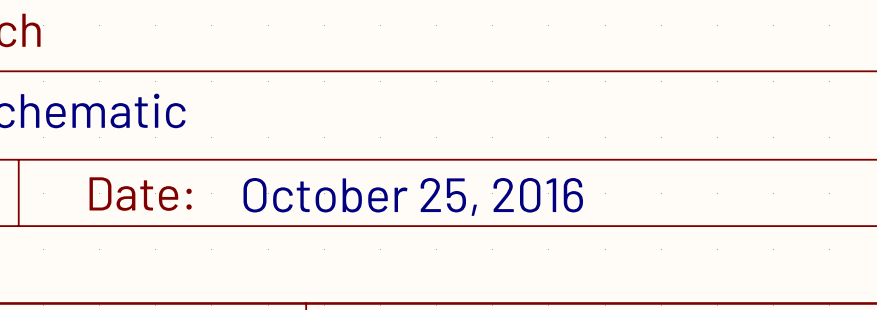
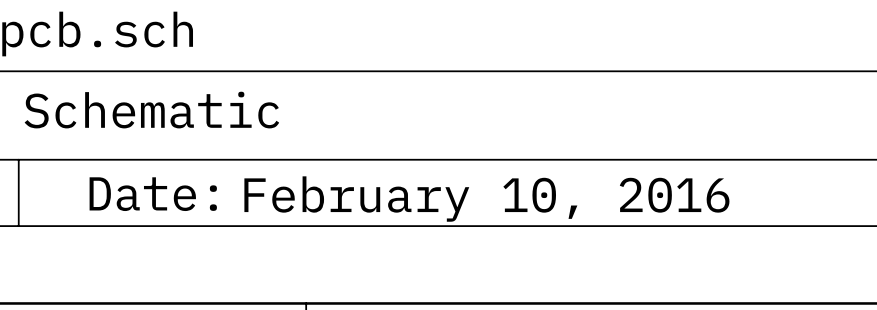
text: October 25, 2016 (413, 196) -> February 10, 2016 (486, 199)

